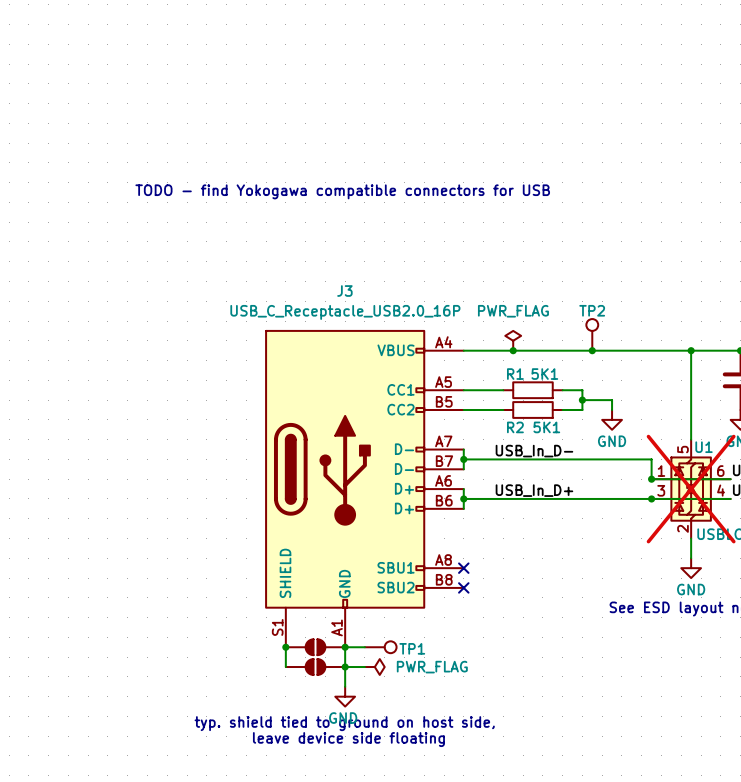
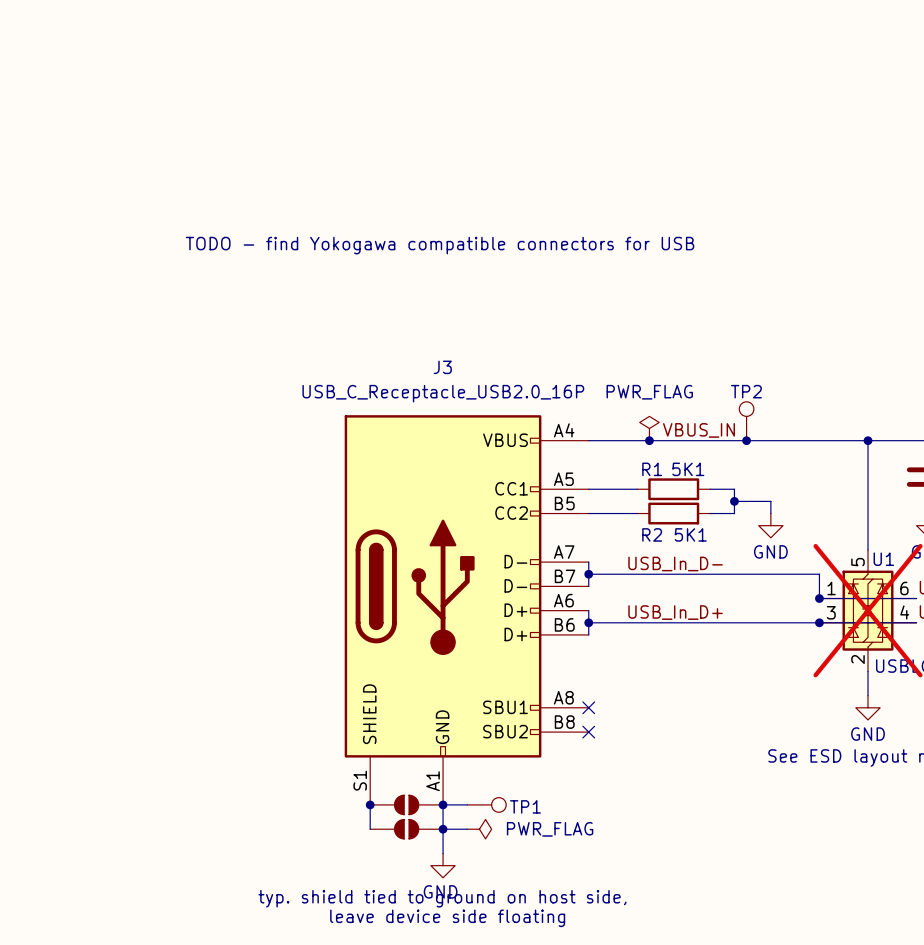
label: none -> VBUS_IN (698, 430)

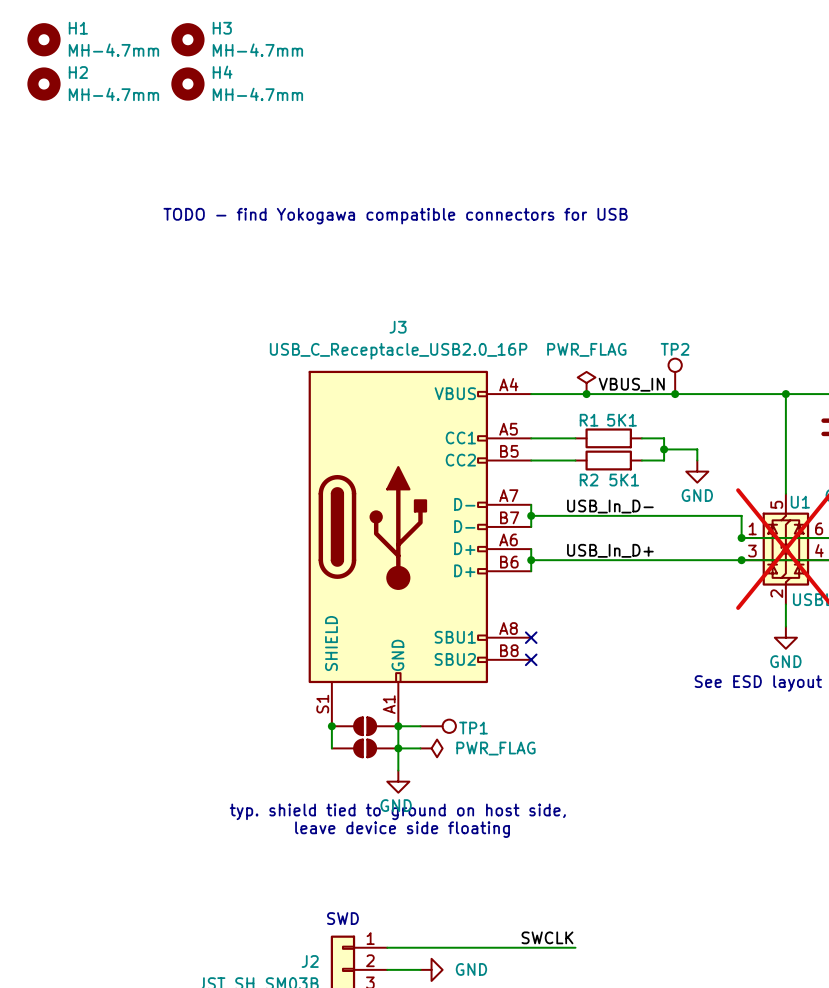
H1: none -> MH-4.7mm (43, 39)
H3: none -> MH-4.7mm (187, 39)
H2: none -> MH-4.7mm (43, 84)
H4: none -> MH-4.7mm (187, 84)

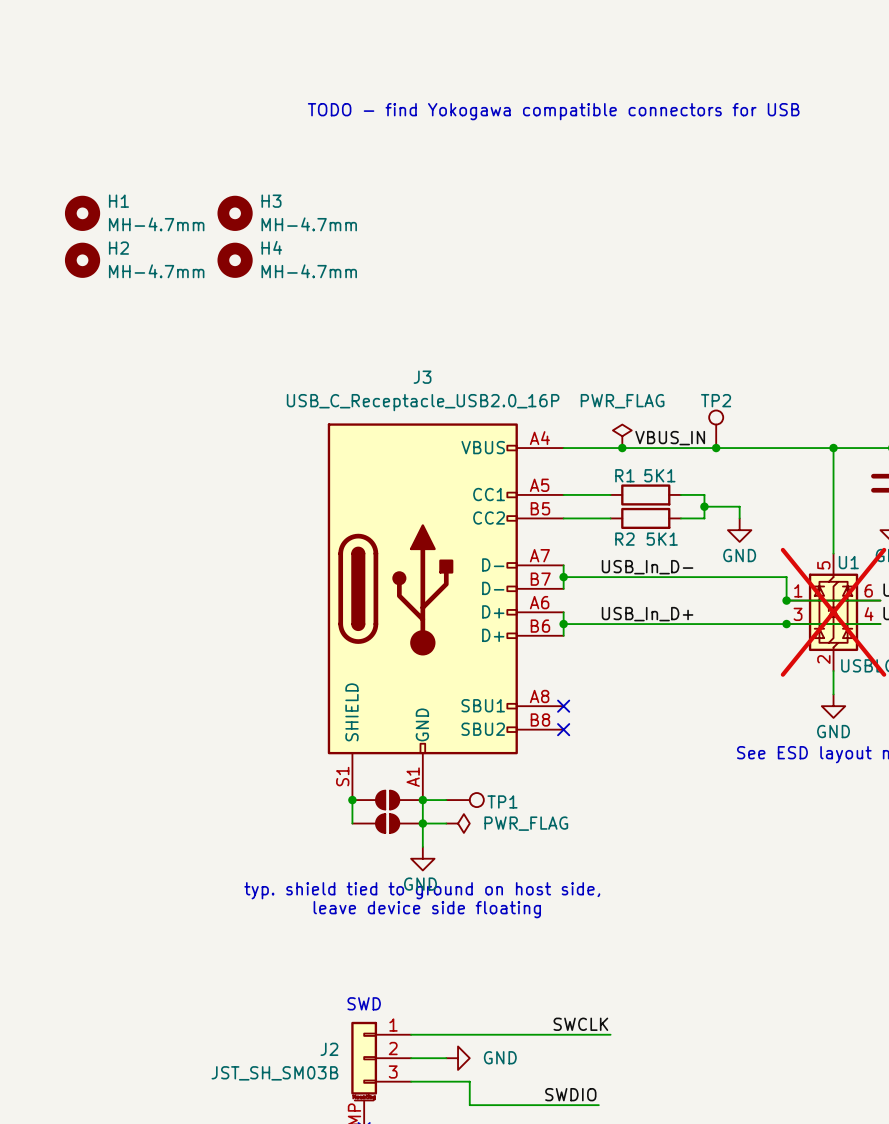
H1 position: (43, 39) -> (82, 213)
H3 position: (187, 39) -> (235, 213)
H2 position: (43, 84) -> (82, 260)
H4 position: (187, 84) -> (235, 260)
text position: TODO - find Yokogawa compatible connectors for USB (395, 216) -> TODO - find Yokogawa compatible connectors for USB (553, 111)

